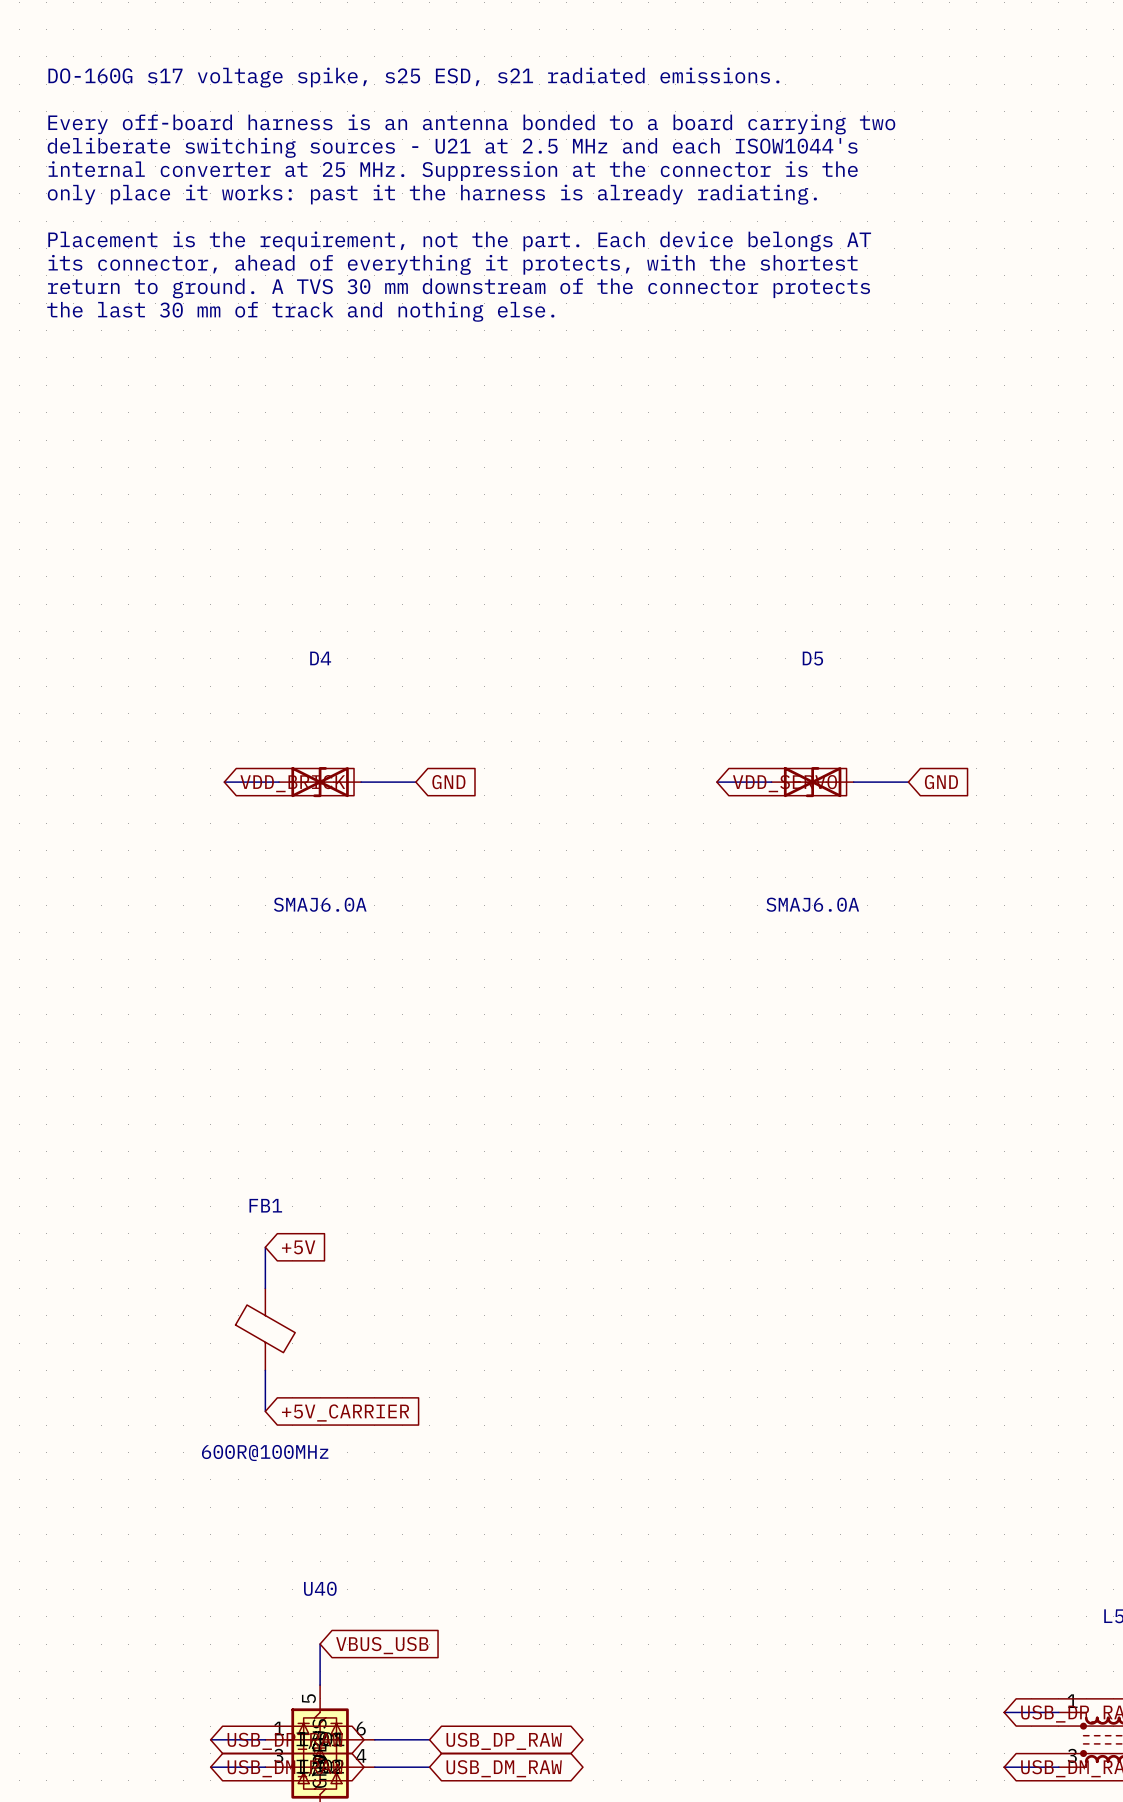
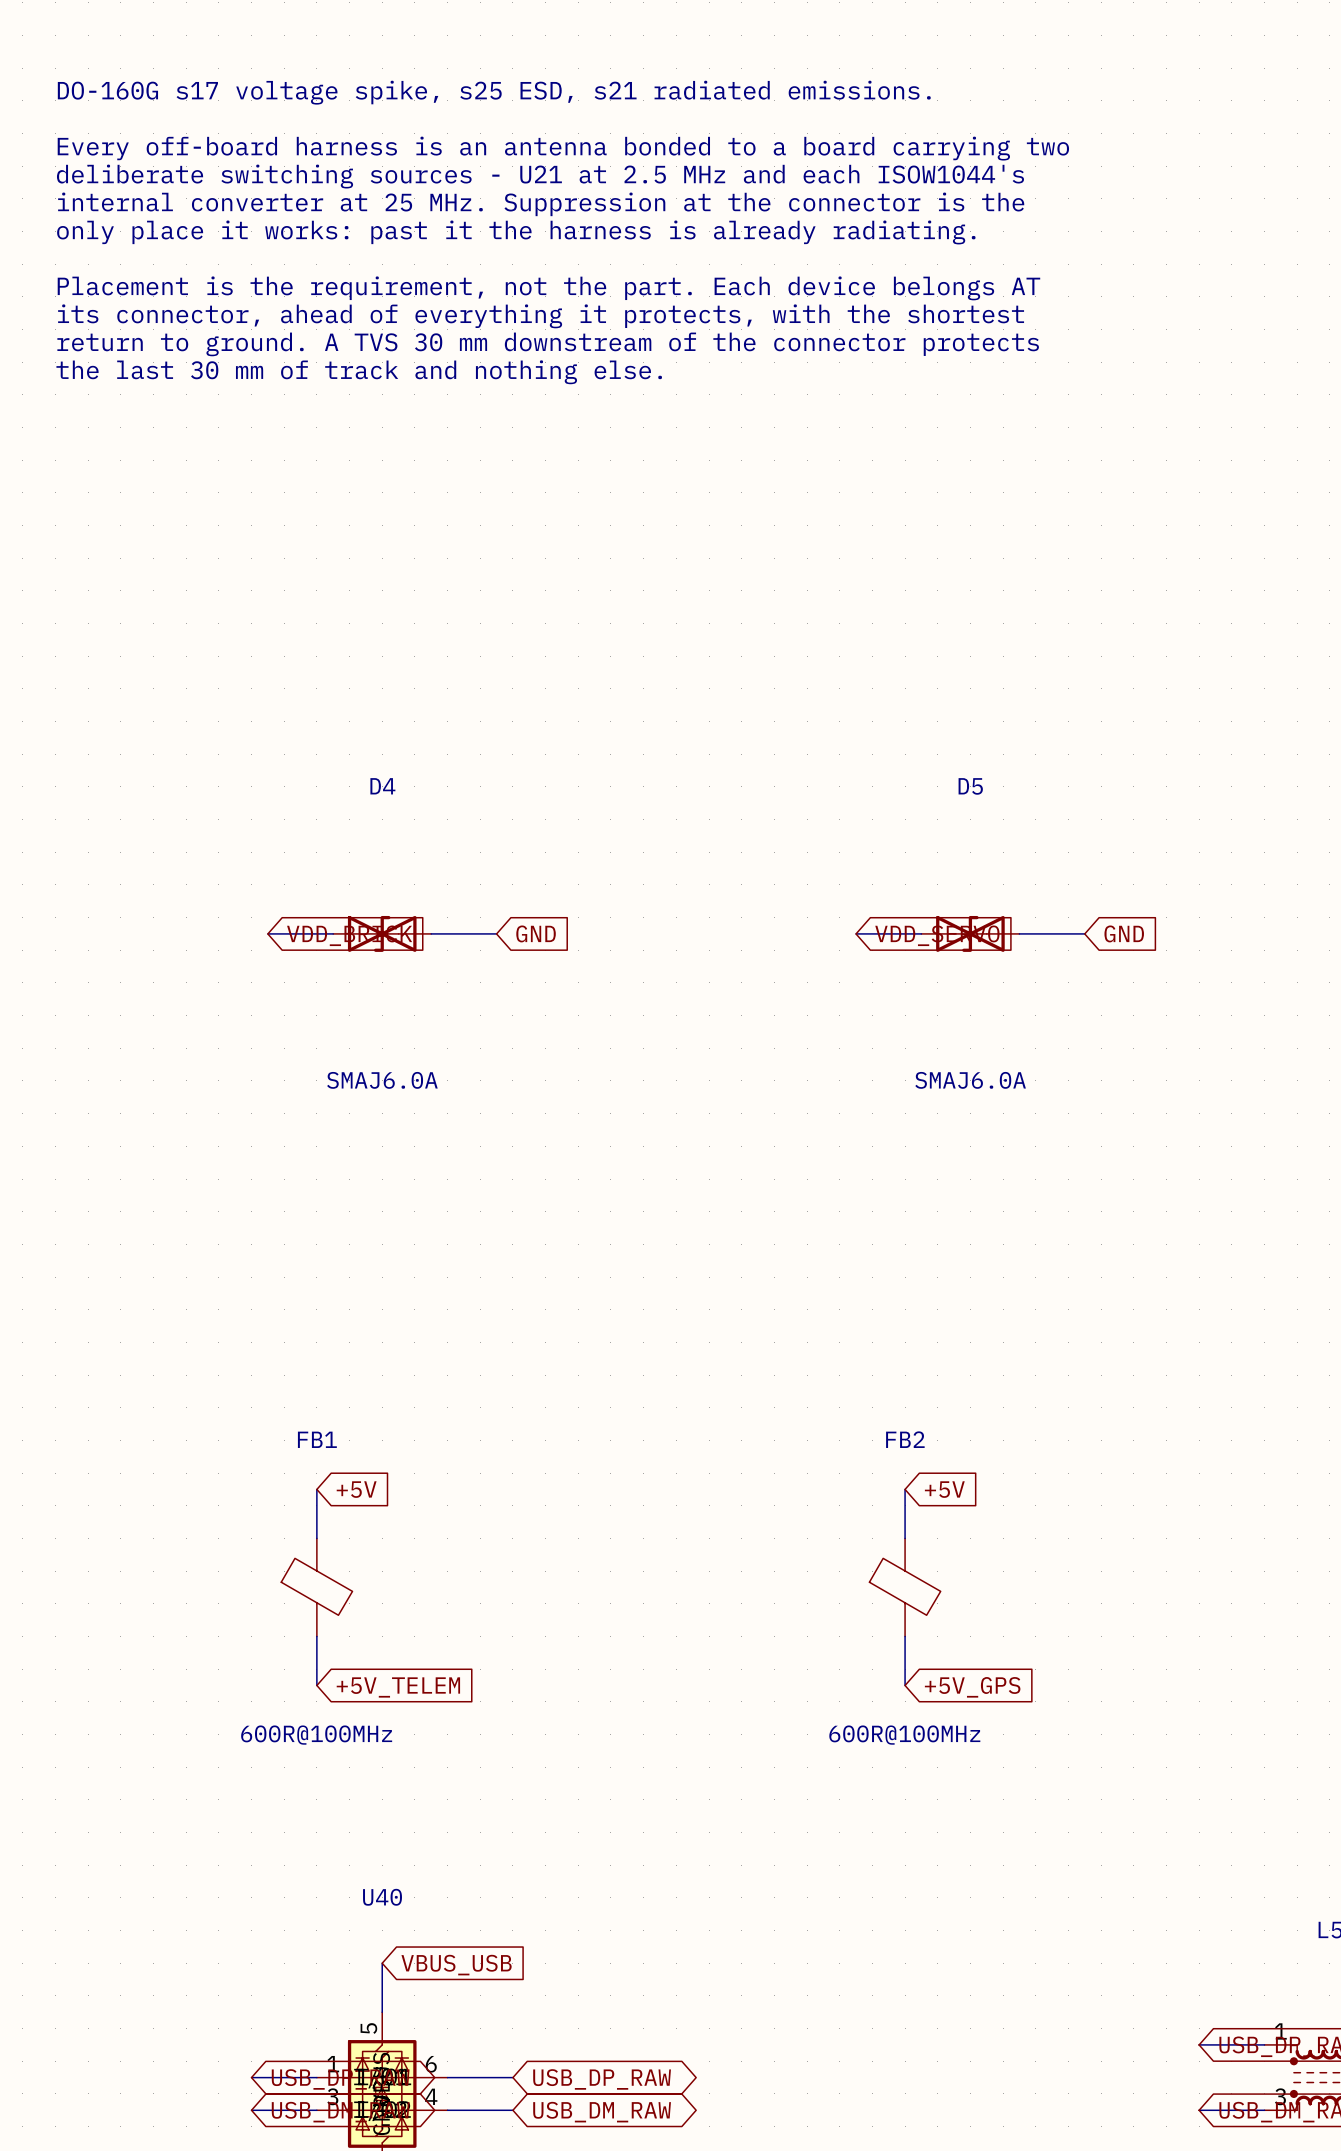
wire: none -> (905, 1489) (905, 1538)
global label: none -> +5V (944, 1489)
FB2: none -> 600R@100MHz (905, 1587)
wire: none -> (905, 1636) (905, 1685)
global label: +5V_CARRIER (345, 1413) -> +5V_TELEM (398, 1687)
global label: none -> +5V_GPS (972, 1687)

